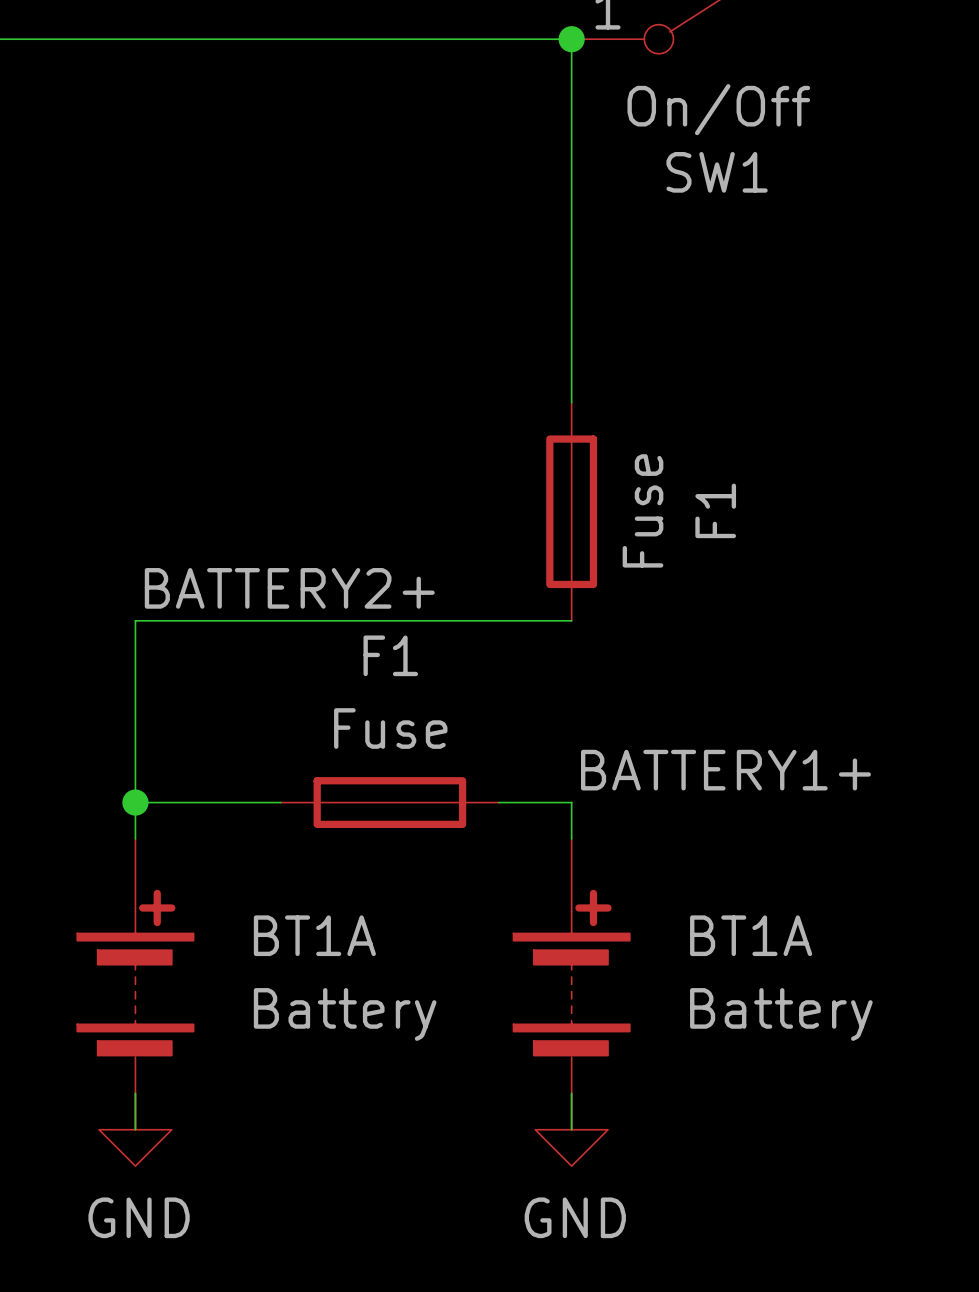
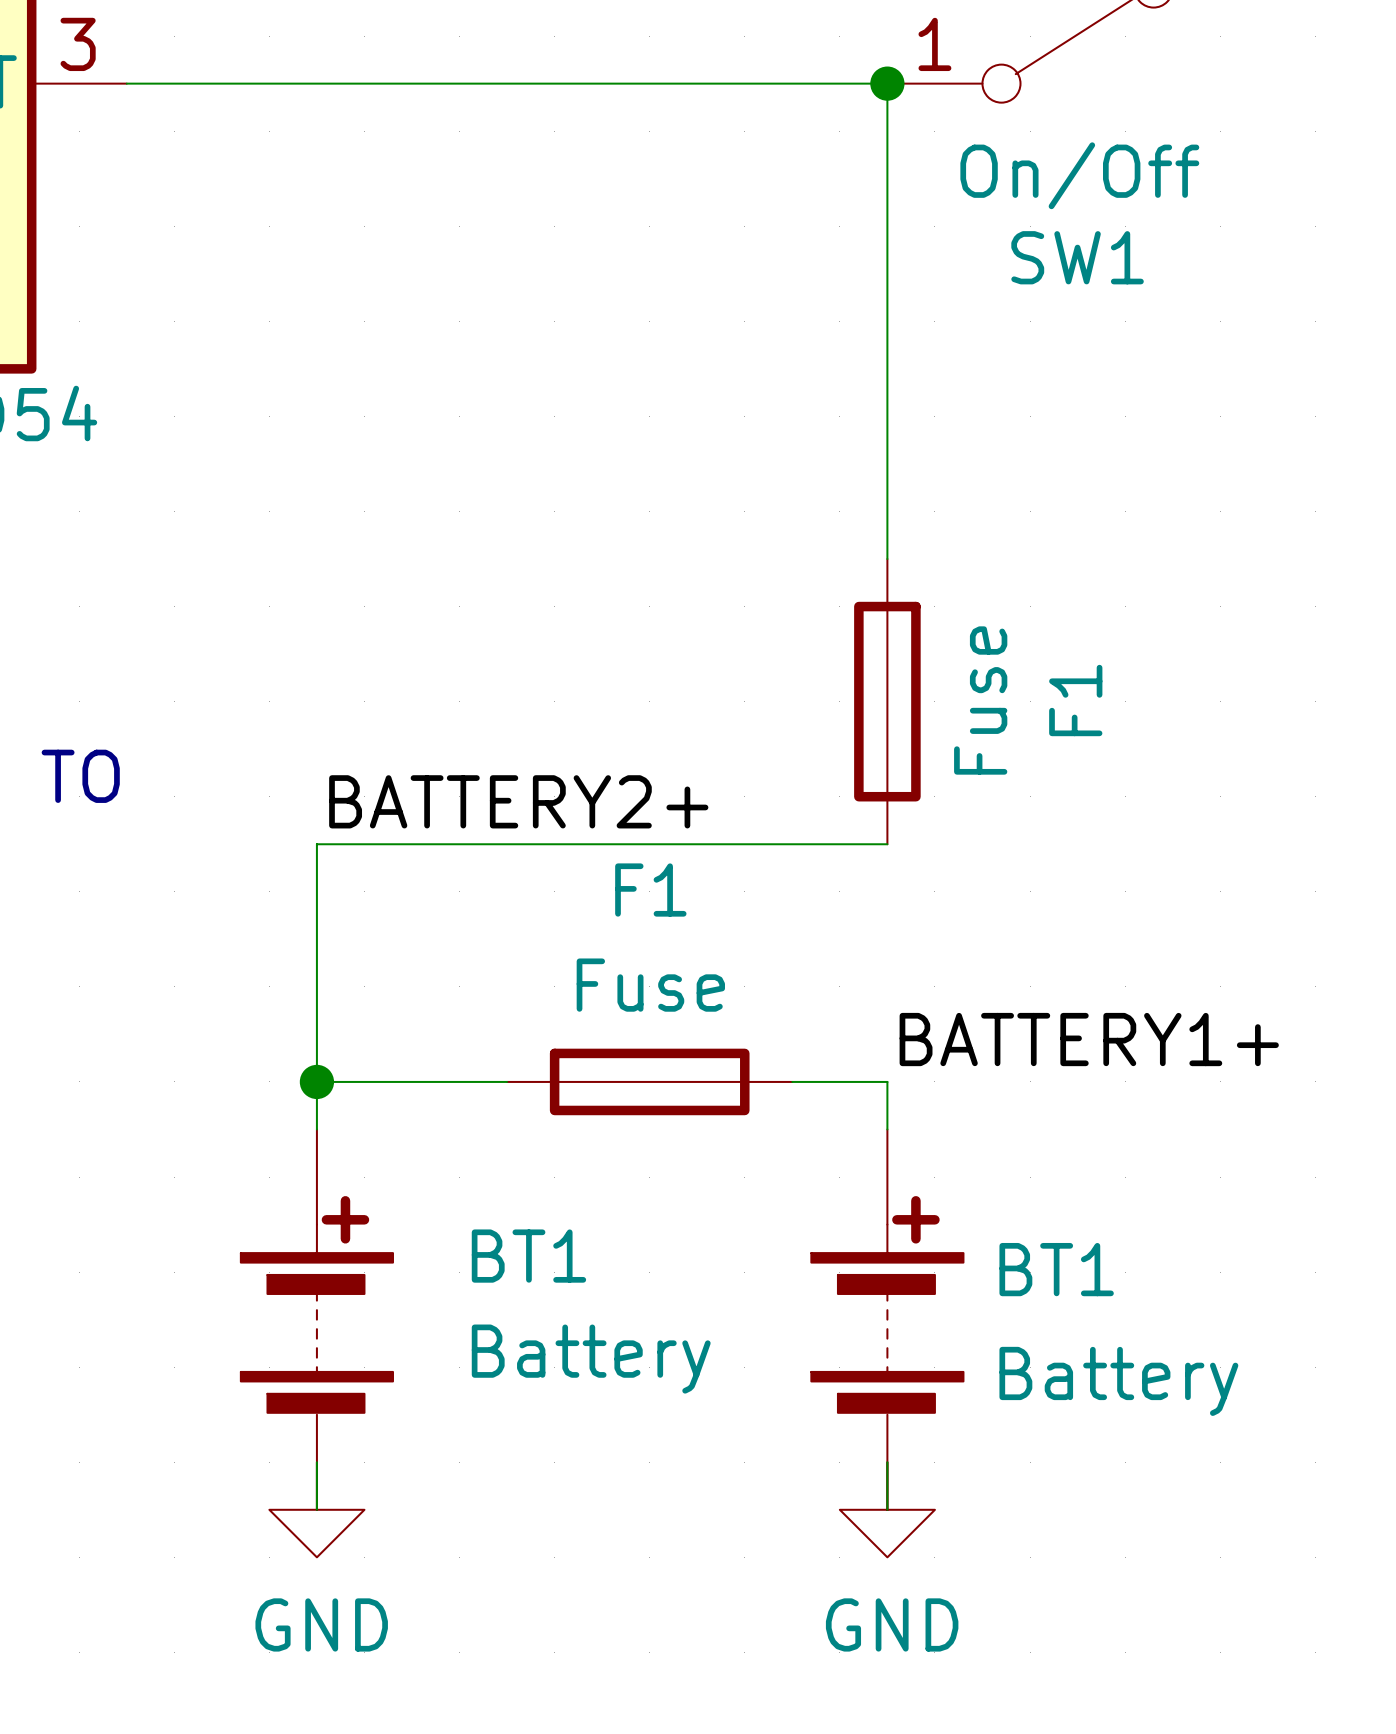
BT1A name: BT1A (314, 935) -> BT1 (528, 1256)
BT1A name: BT1A (751, 935) -> BT1 (1056, 1269)
BT1A value position: Battery (781, 1014) -> Battery (1118, 1381)

